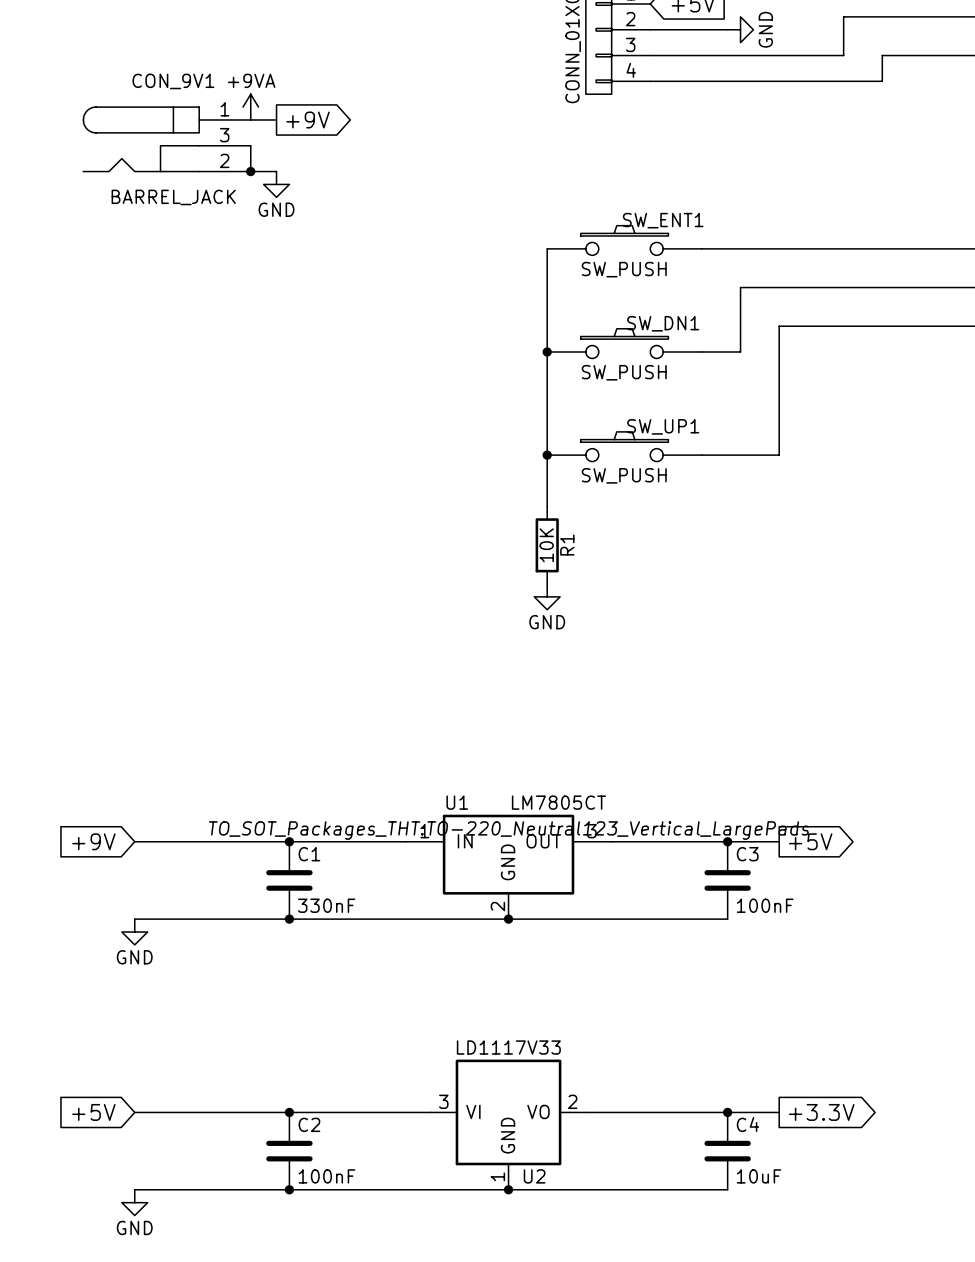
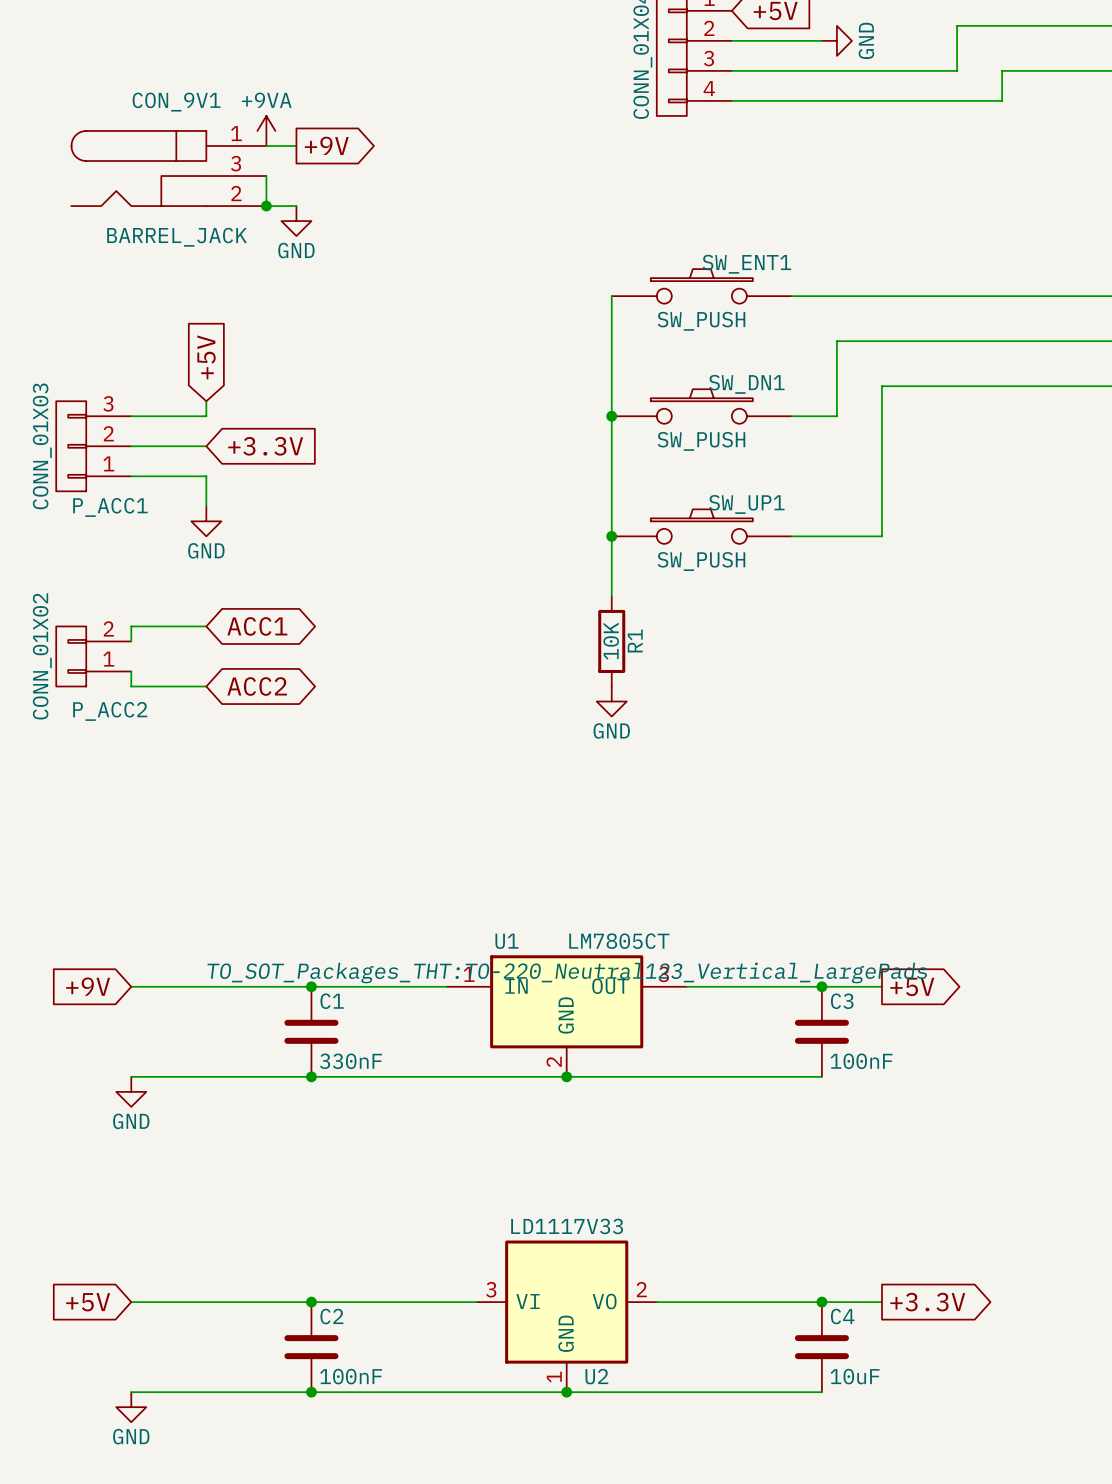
global label: none -> +5V (206, 357)
wire: none -> (206, 401) (206, 416) (131, 416)
P_ACC1: none -> CONN_01X03 (93, 446)
wire: none -> (131, 446) (206, 446)
global label: none -> +3.3V (265, 446)
wire: none -> (131, 476) (206, 476) (206, 506)
power symbol: none -> GND (206, 521)
wire: none -> (206, 626) (131, 626) (131, 641)
global label: none -> ACC1 (257, 626)
P_ACC2: none -> CONN_01X02 (93, 656)
wire: none -> (131, 671) (131, 686) (206, 686)
global label: none -> ACC2 (257, 686)

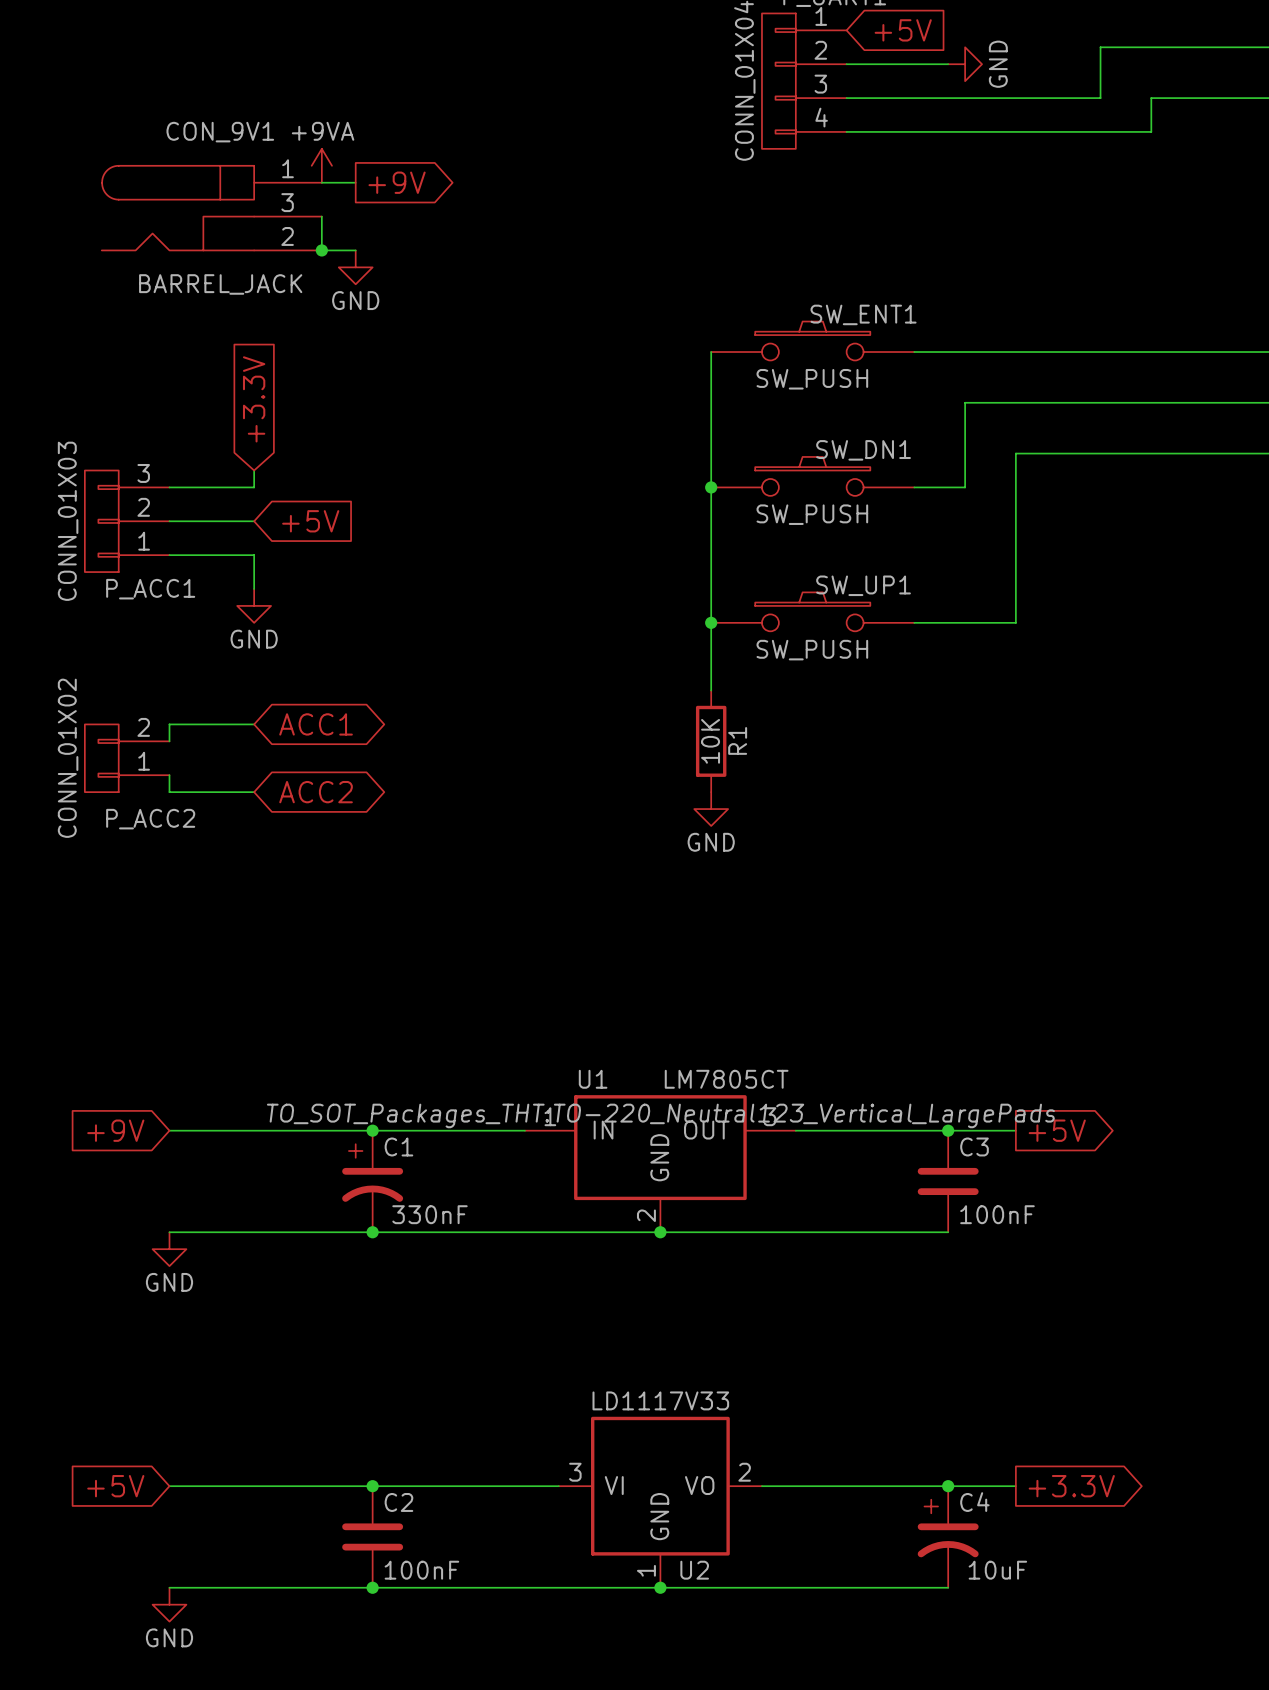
global label: +5V (206, 357) -> +3.3V (254, 399)
global label: +3.3V (265, 446) -> +5V (310, 521)
C1 symbol: [284, 986, 339, 1077] -> [342, 1130, 404, 1233]
C4 symbol: [794, 1302, 849, 1393] -> [917, 1486, 979, 1588]

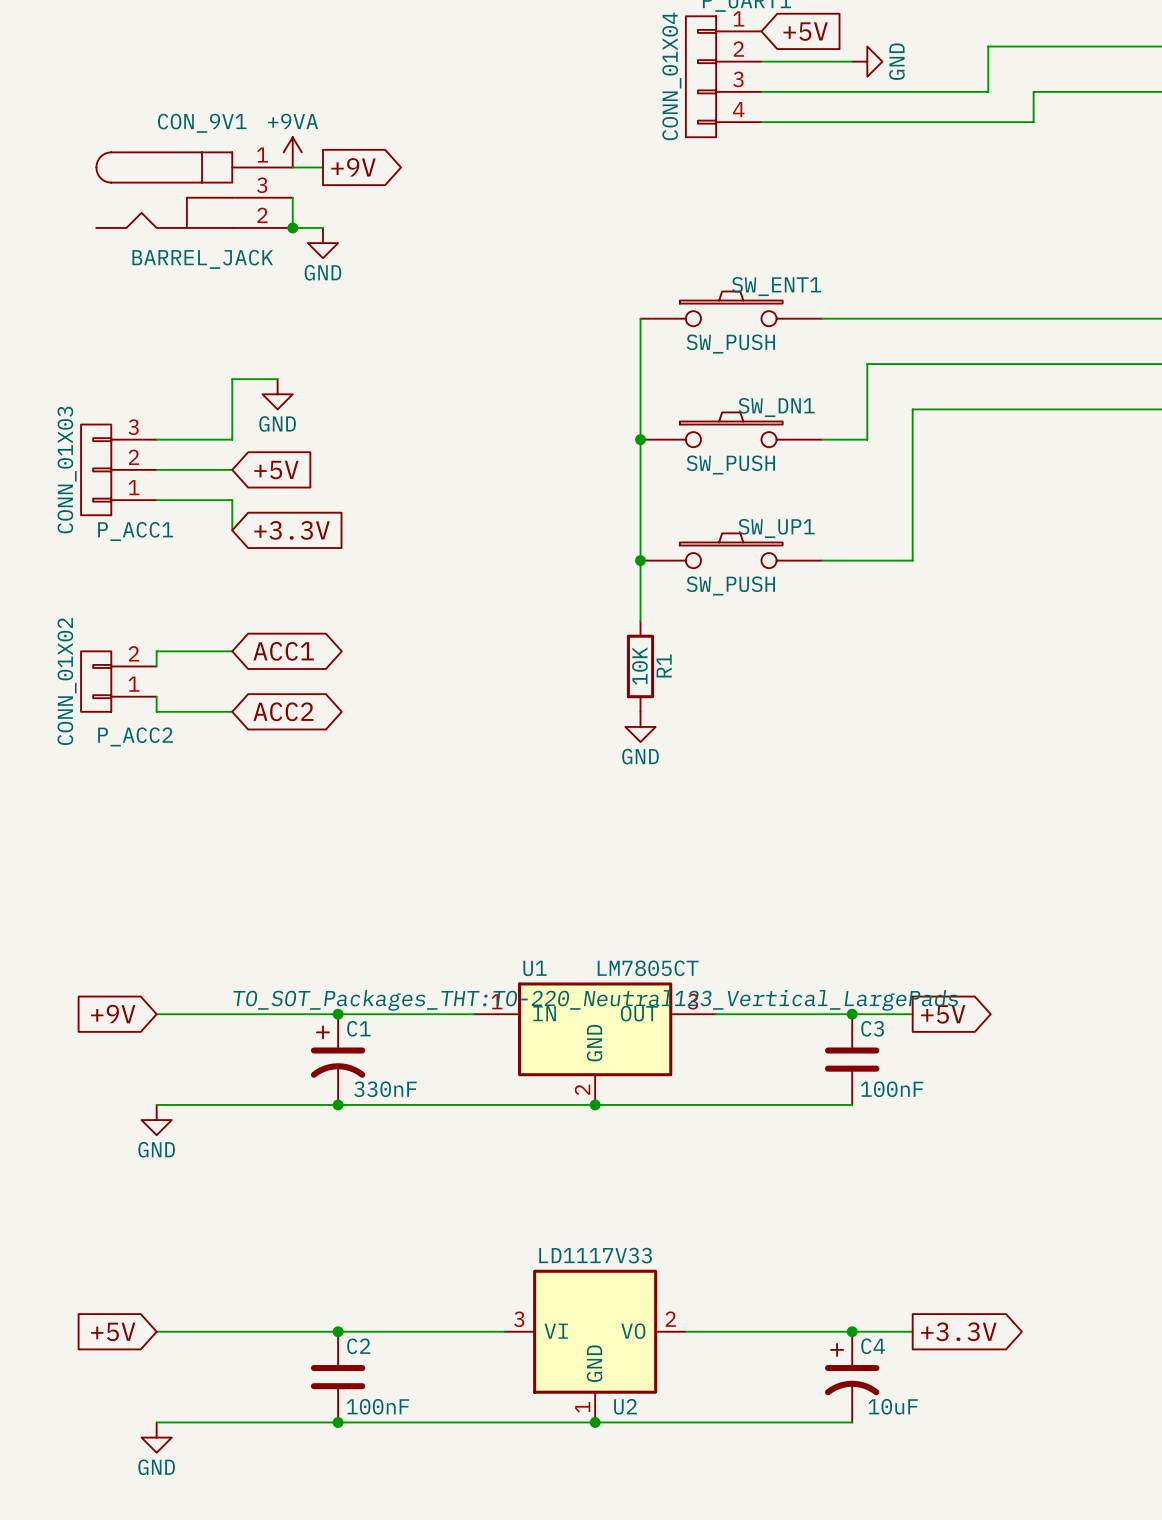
global label rotation: 0° (254, 399) -> 90° clockwise (292, 530)
global label position: +3.3V (254, 399) -> +3.3V (292, 530)
wire: none -> (277, 379) (232, 379) (232, 424)
power symbol position: GND (254, 605) -> GND (277, 394)

